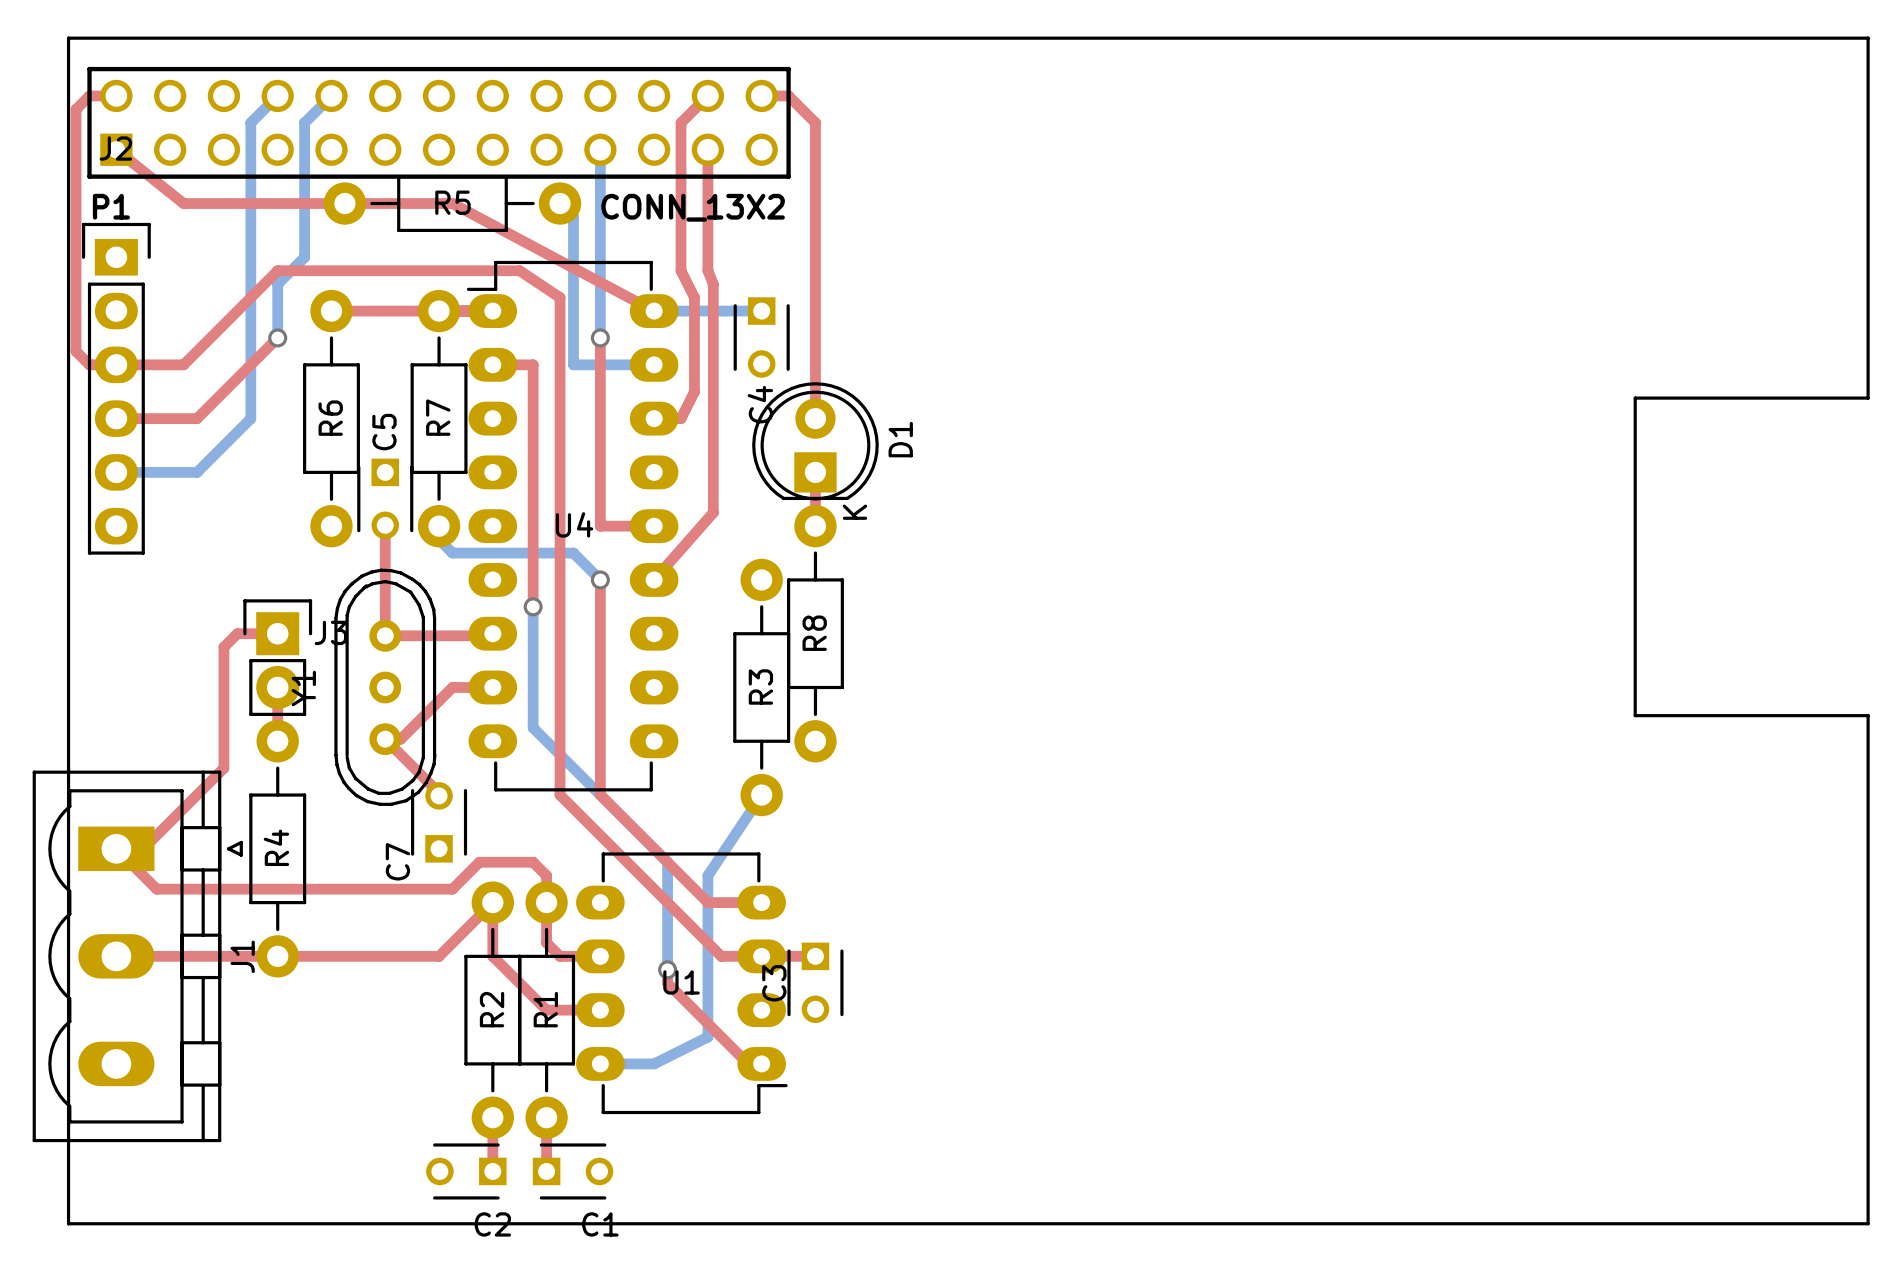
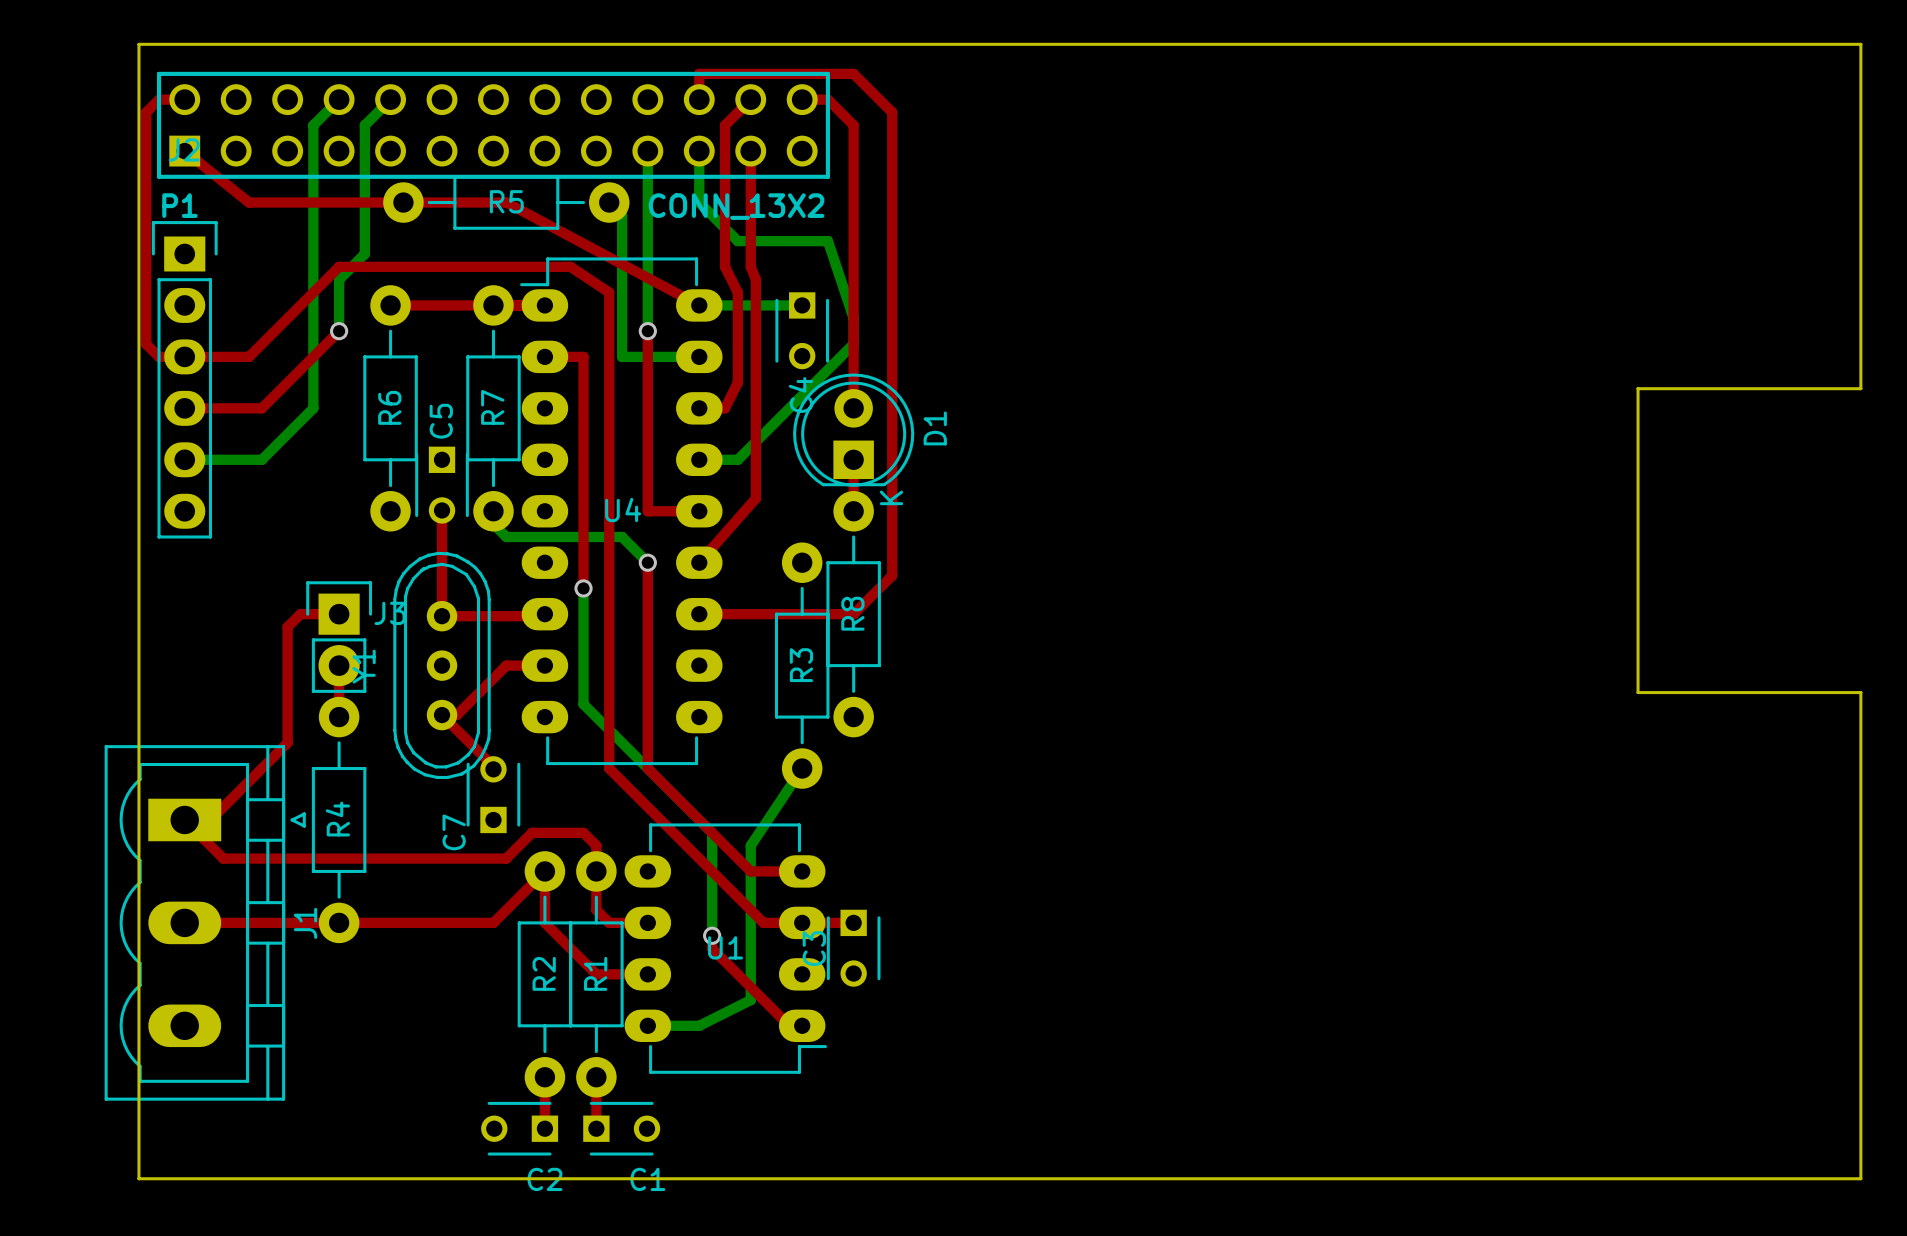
top track: none -> (699, 99) (699, 73) (853, 73) (892, 112) (892, 575) (853, 614) (699, 614)
bottom track: none -> (699, 151) (699, 202) (737, 241) (827, 241) (853, 318) (853, 344) (737, 459) (699, 459)

